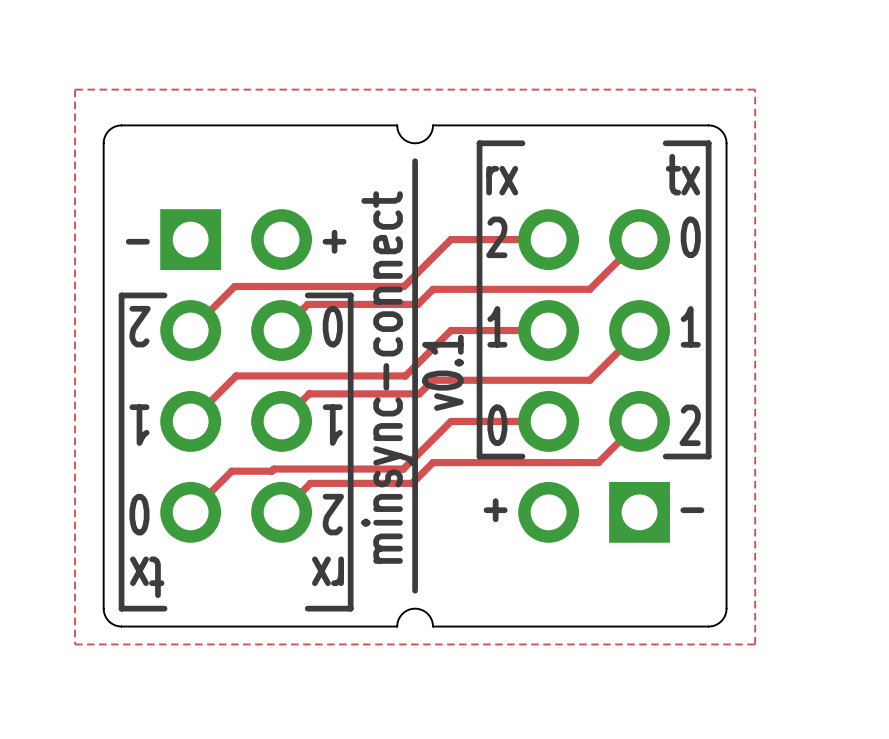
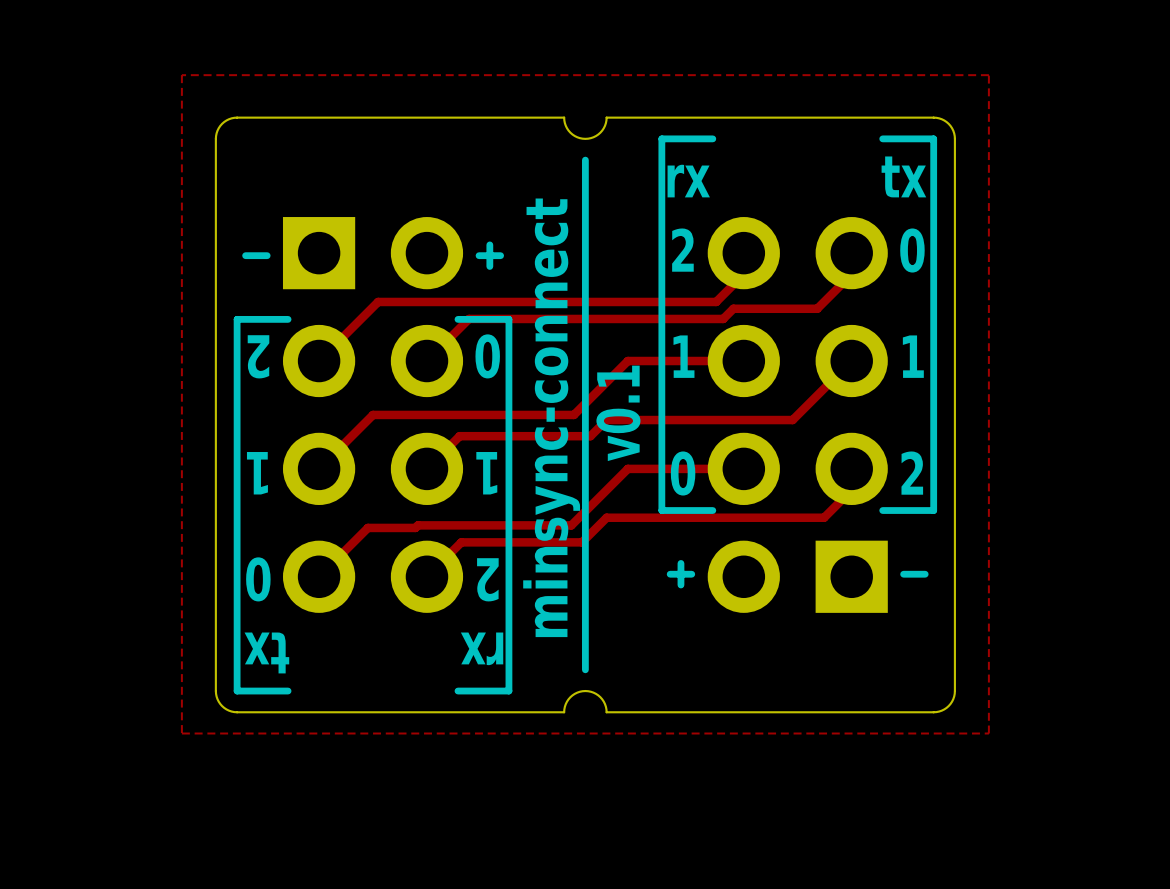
track: (548, 239) (450, 239) (404, 286) (234, 286) -> (765, 253) (716, 301) (378, 301) (371, 308)
track: (639, 239) (589, 289) (433, 289) (417, 304) (307, 304) -> (872, 253) (817, 308) (733, 308) (723, 318) (469, 318) (457, 330)
track: (639, 421) (598, 462) -> (872, 468) (824, 517) (802, 517)

